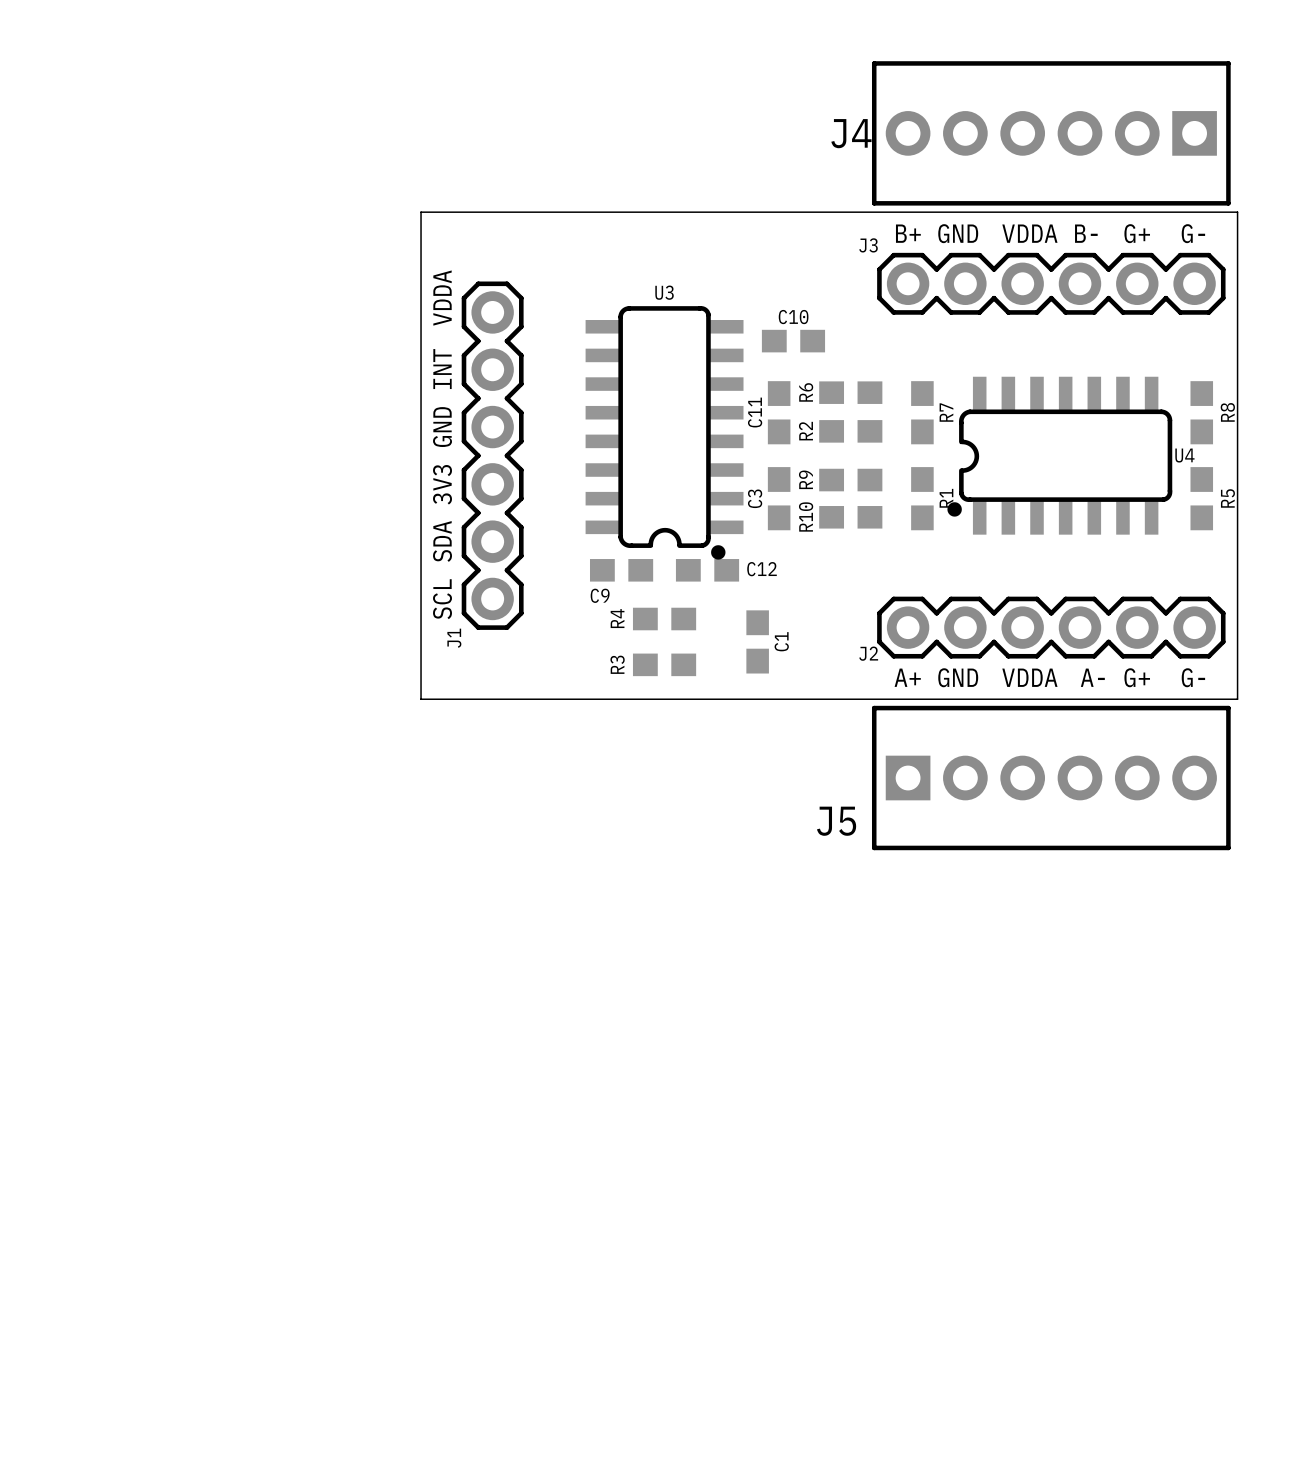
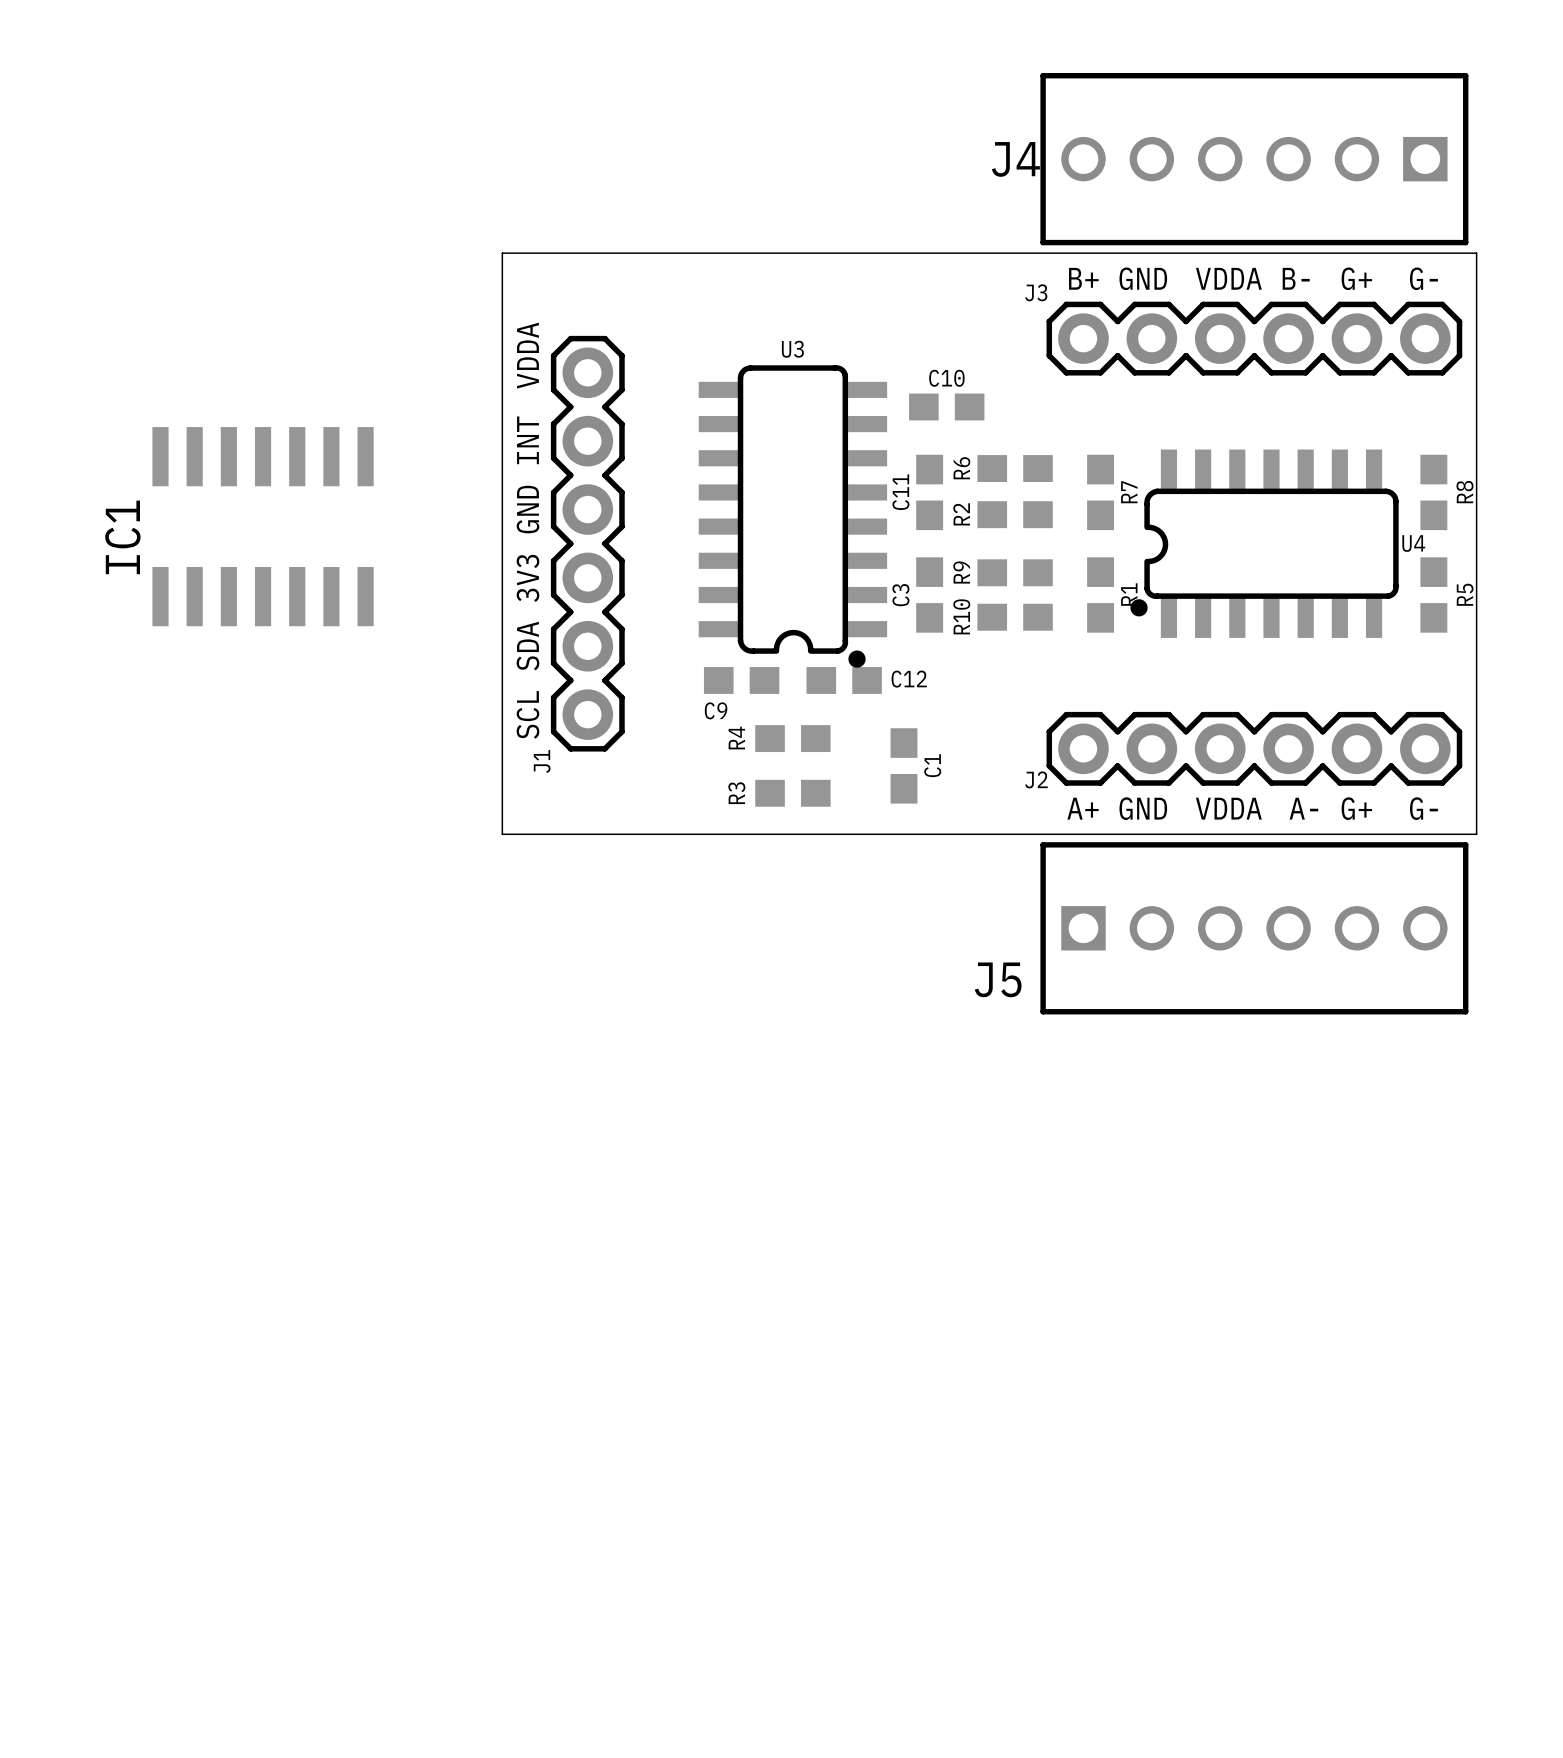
J4 footprint: [871, 61, 1231, 206] -> [1040, 73, 1469, 246]
IC1: none -> (263, 526)
J5 footprint: [871, 705, 1231, 851] -> [1040, 842, 1469, 1015]

